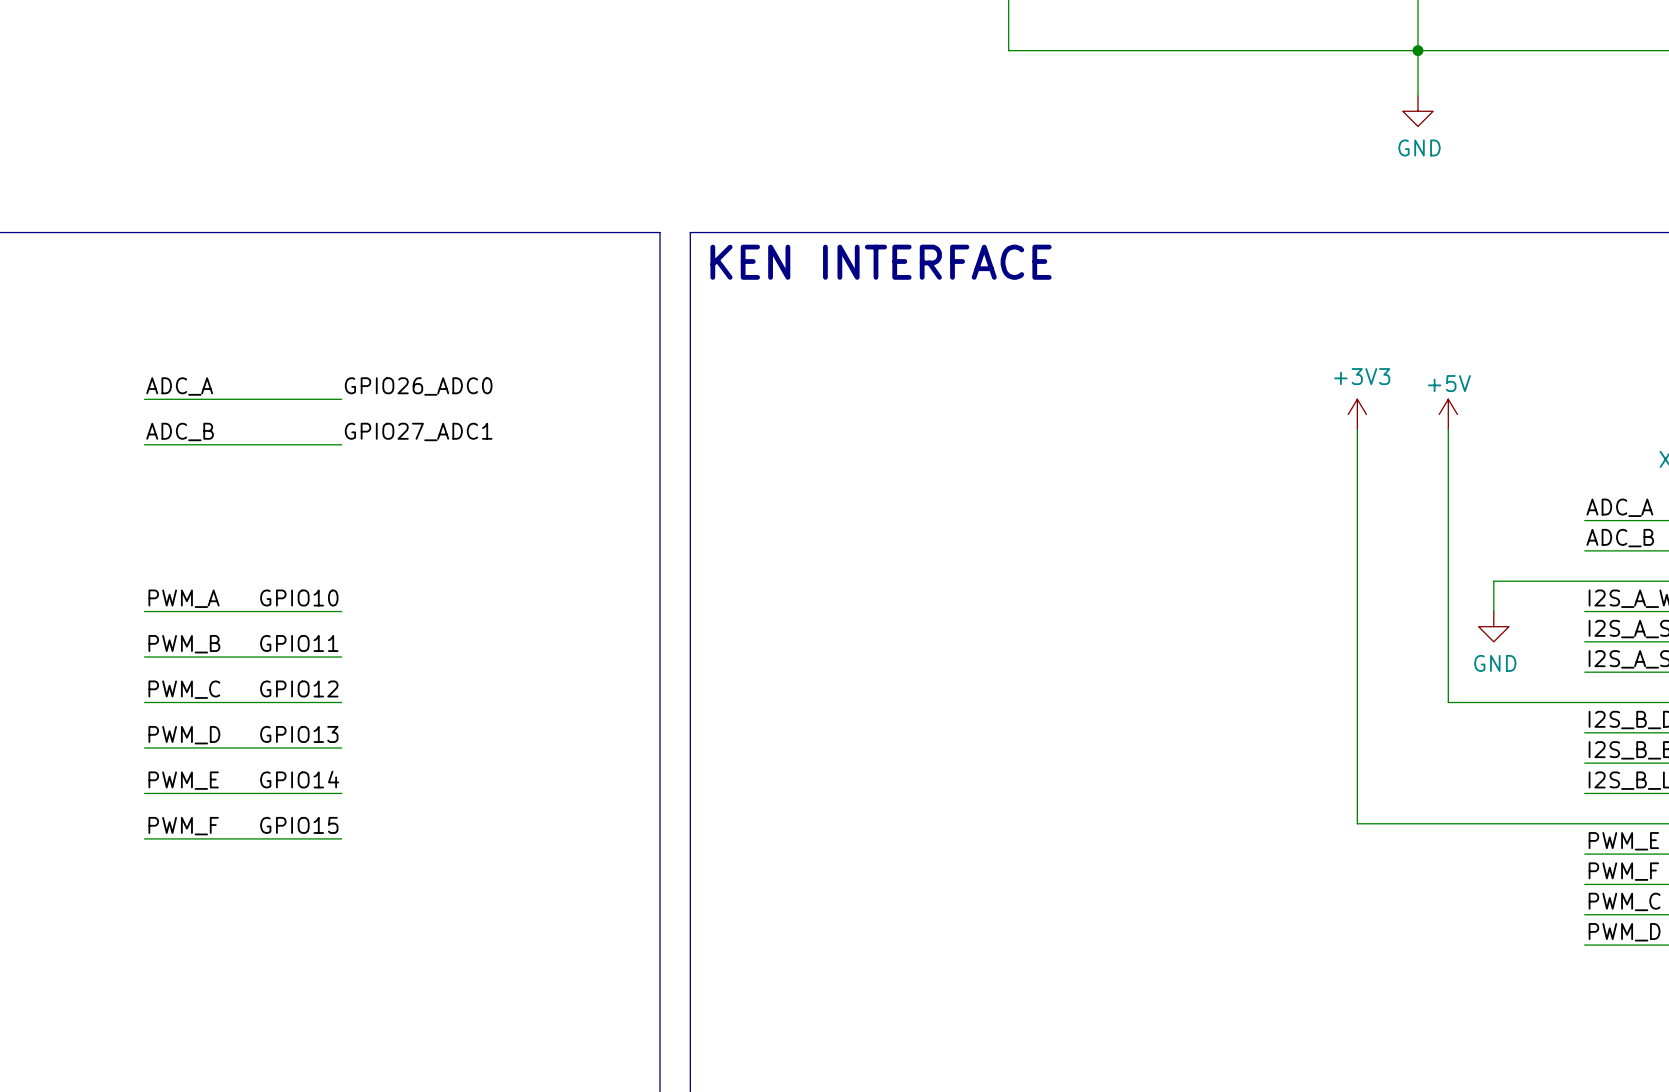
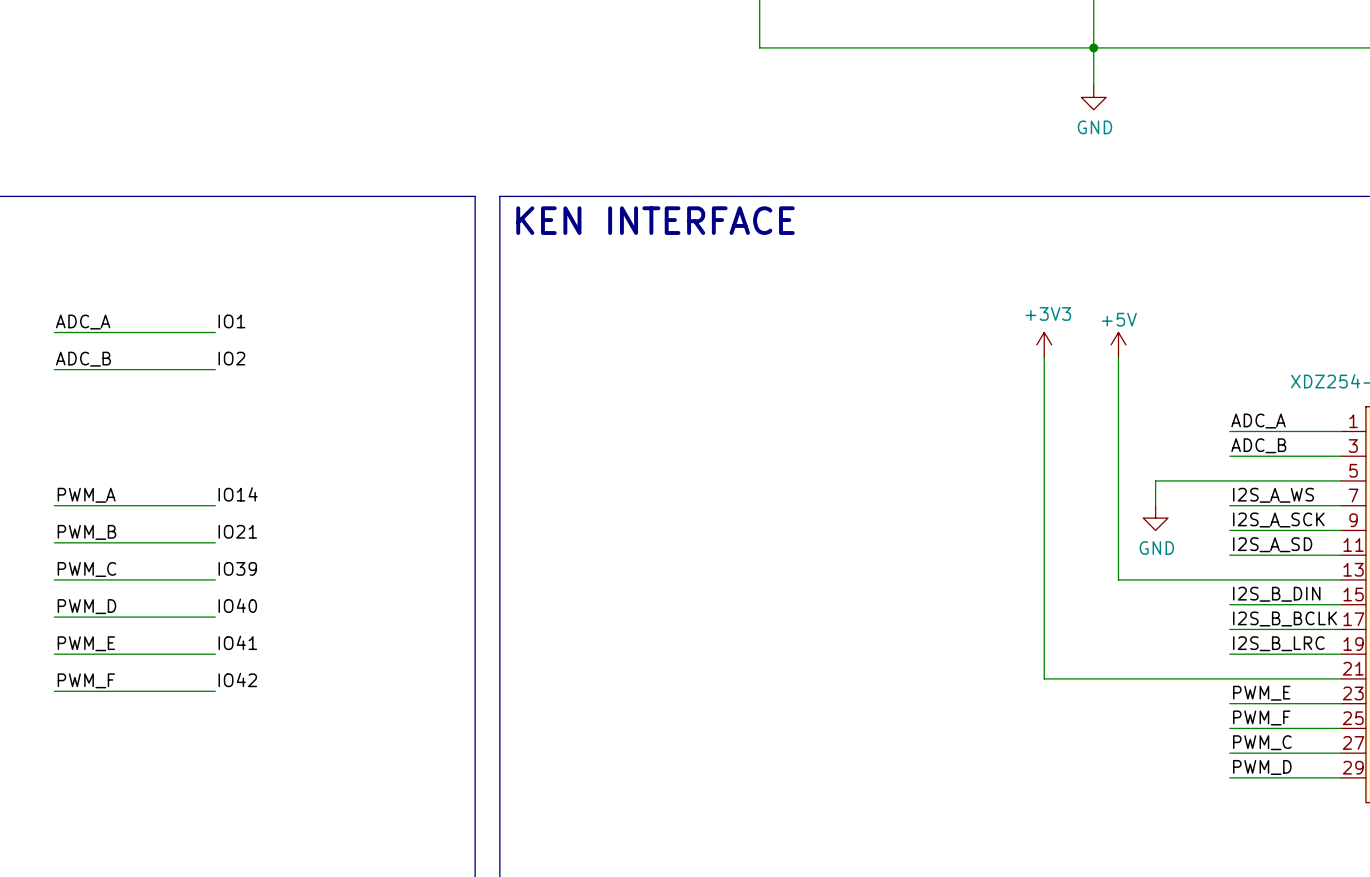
label: GPIO26_ADC0 (418, 386) -> IO1 (231, 321)
label: GPIO27_ADC1 (418, 431) -> IO2 (231, 358)
label: GPIO10 (299, 598) -> IO14 (238, 494)
label: GPIO11 (299, 643) -> IO21 (237, 531)
label: GPIO12 (299, 688) -> IO39 (237, 568)
label: GPIO13 (299, 734) -> IO40 (237, 605)
label: GPIO14 (299, 779) -> IO41 (237, 642)
label: GPIO15 (299, 825) -> IO42 (237, 679)

